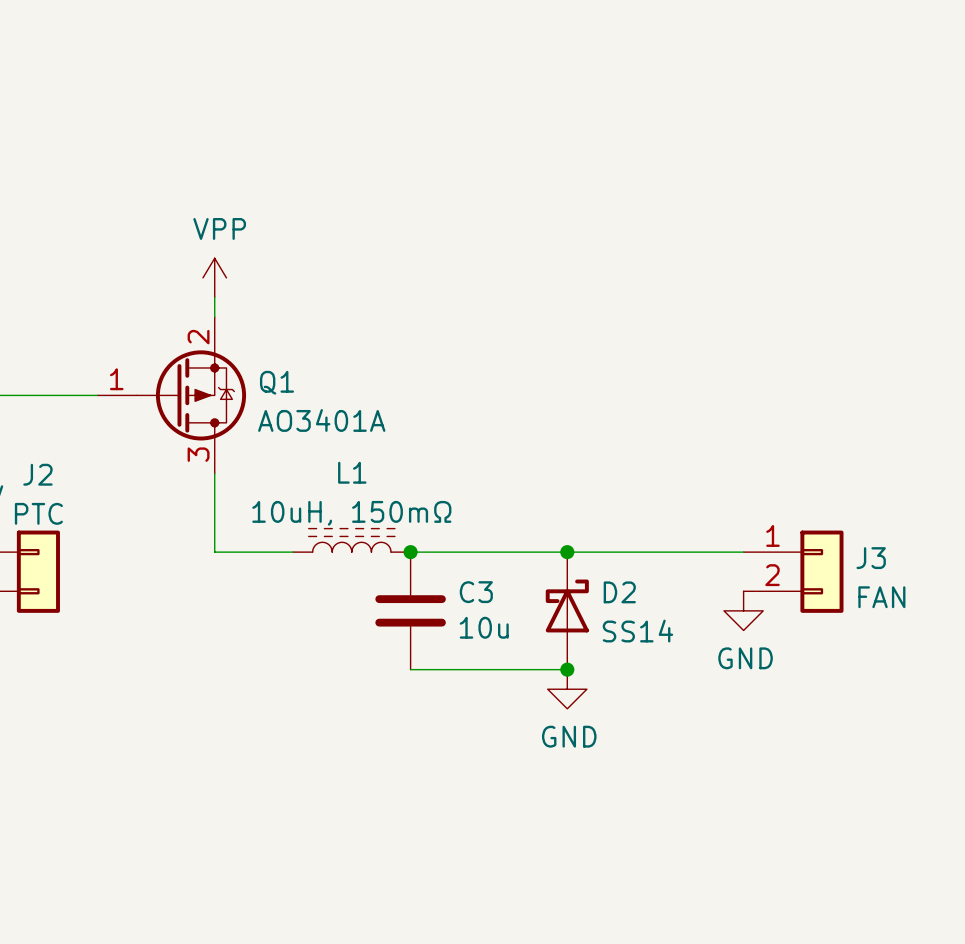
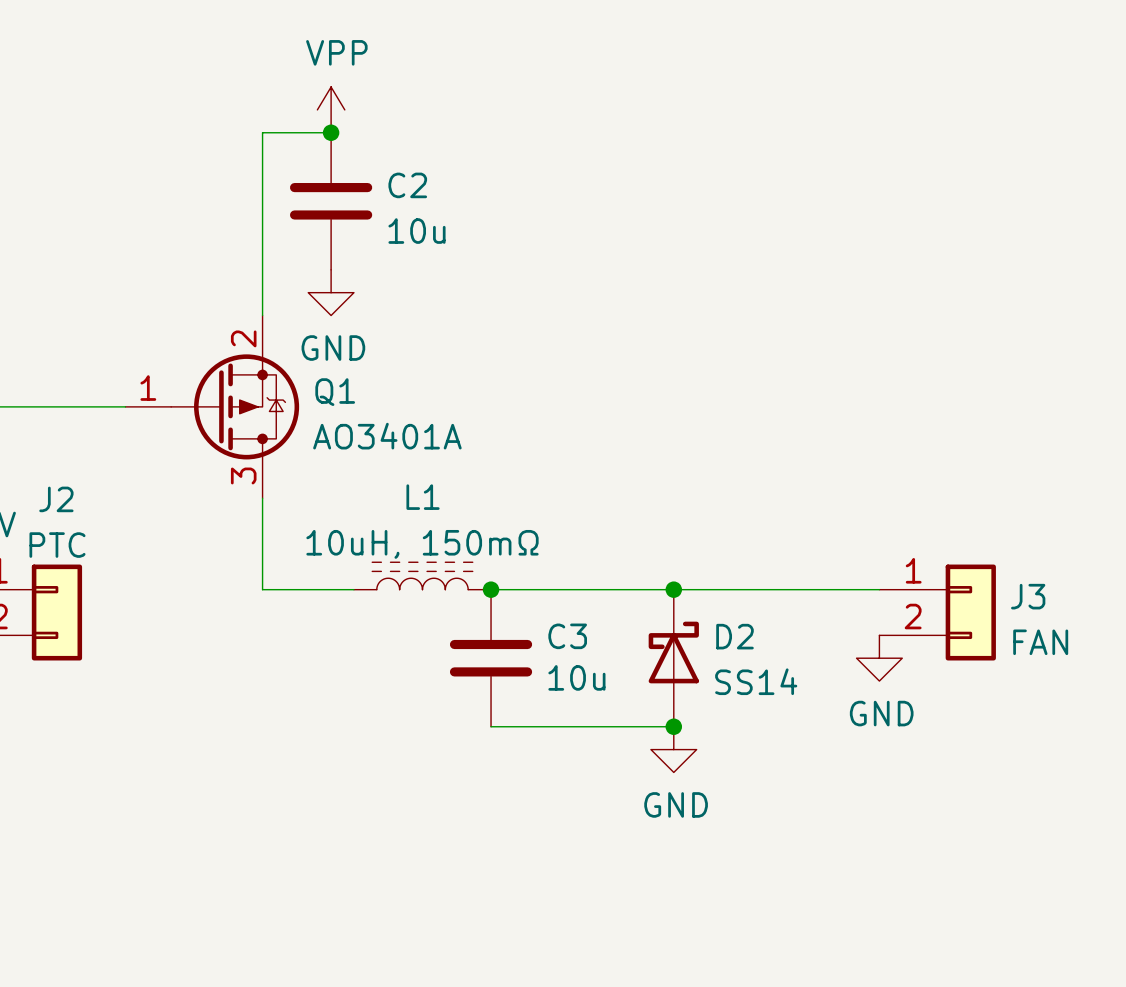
wire: none -> (331, 132) (262, 132) (262, 292)
junction: none -> (331, 132)
C2: none -> 10u (331, 201)
power symbol position: VPP (214, 277) -> VPP (331, 109)
power symbol: none -> GND (331, 292)

